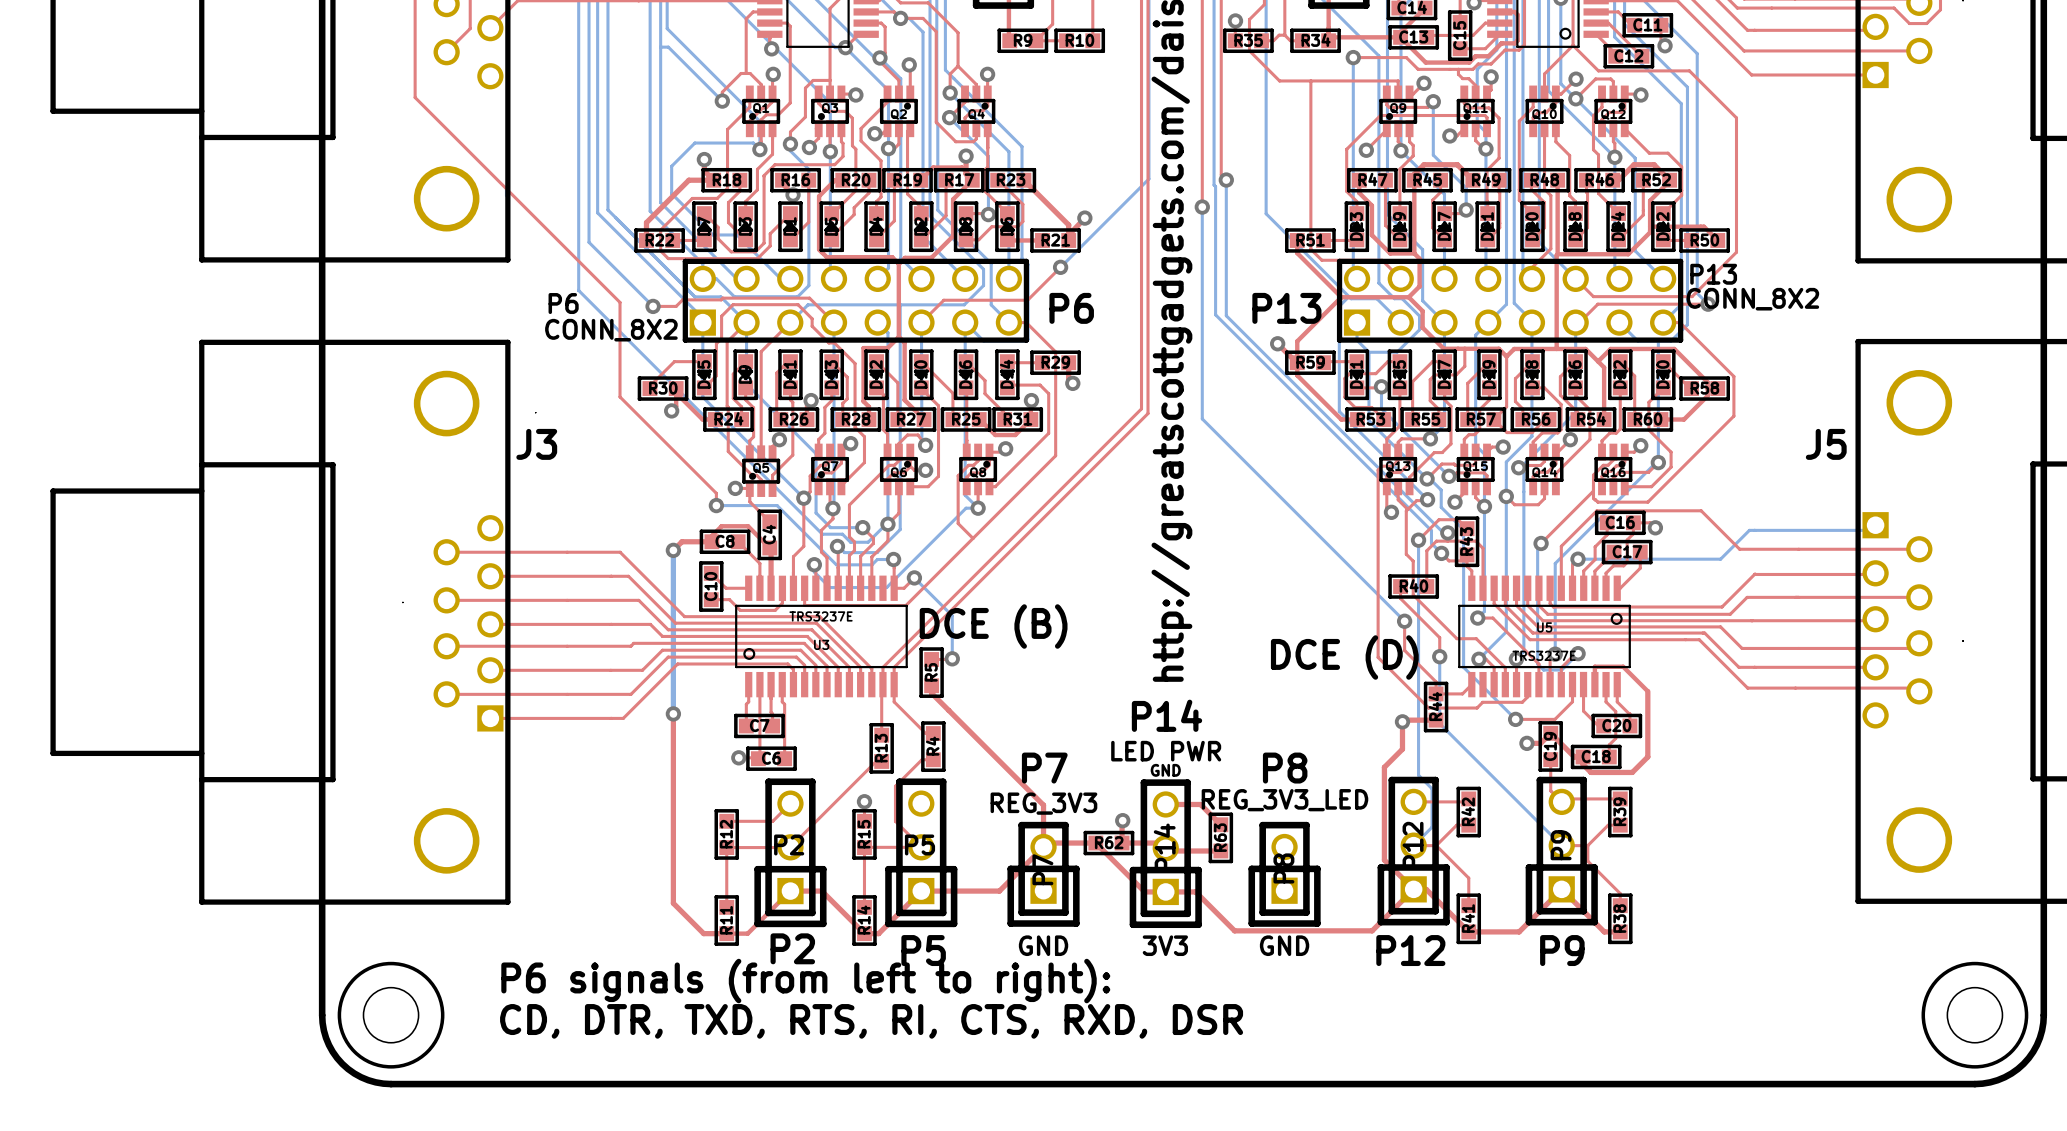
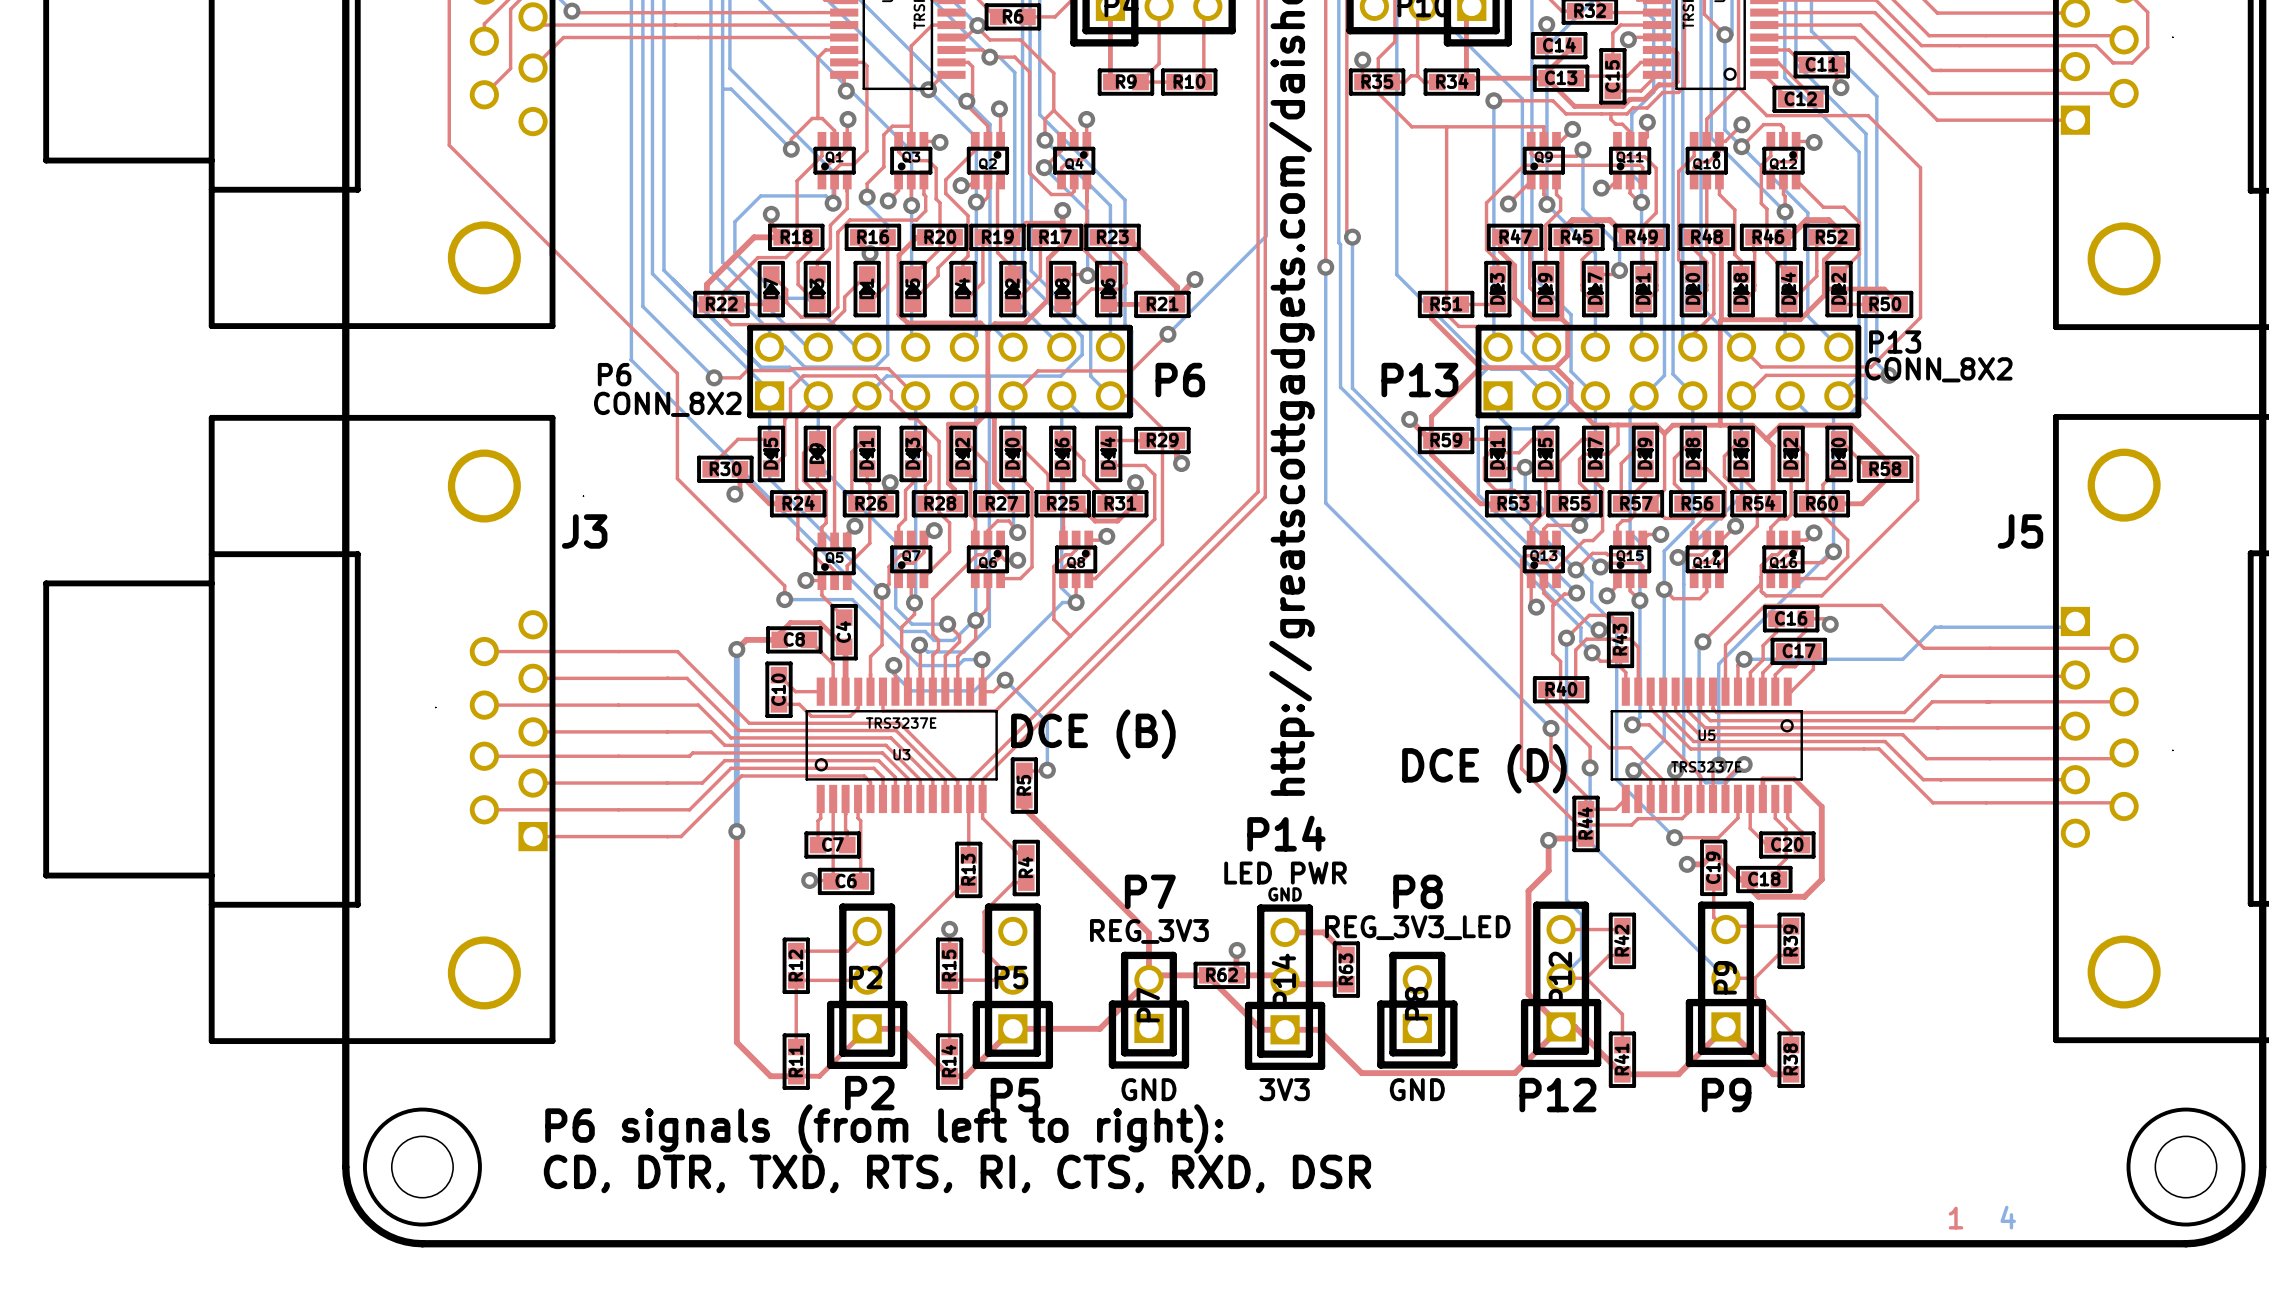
text: none -> 4 (2008, 1217)
text: none -> 1 (1955, 1218)

